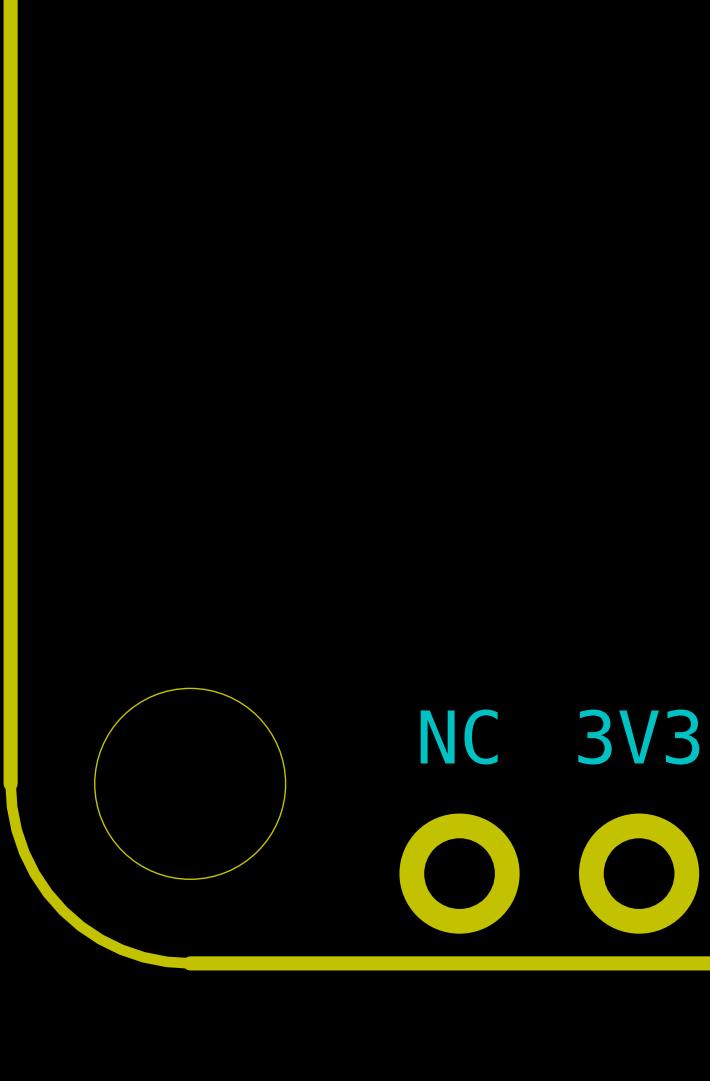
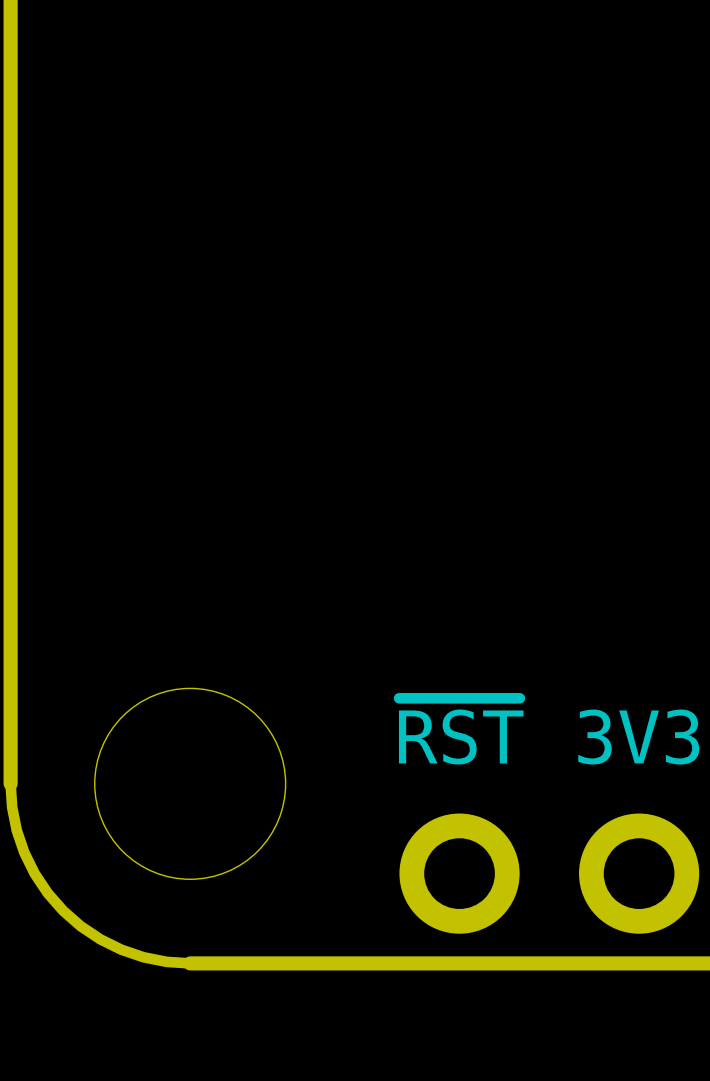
text: NC (459, 737) -> ~{RST} (461, 731)

